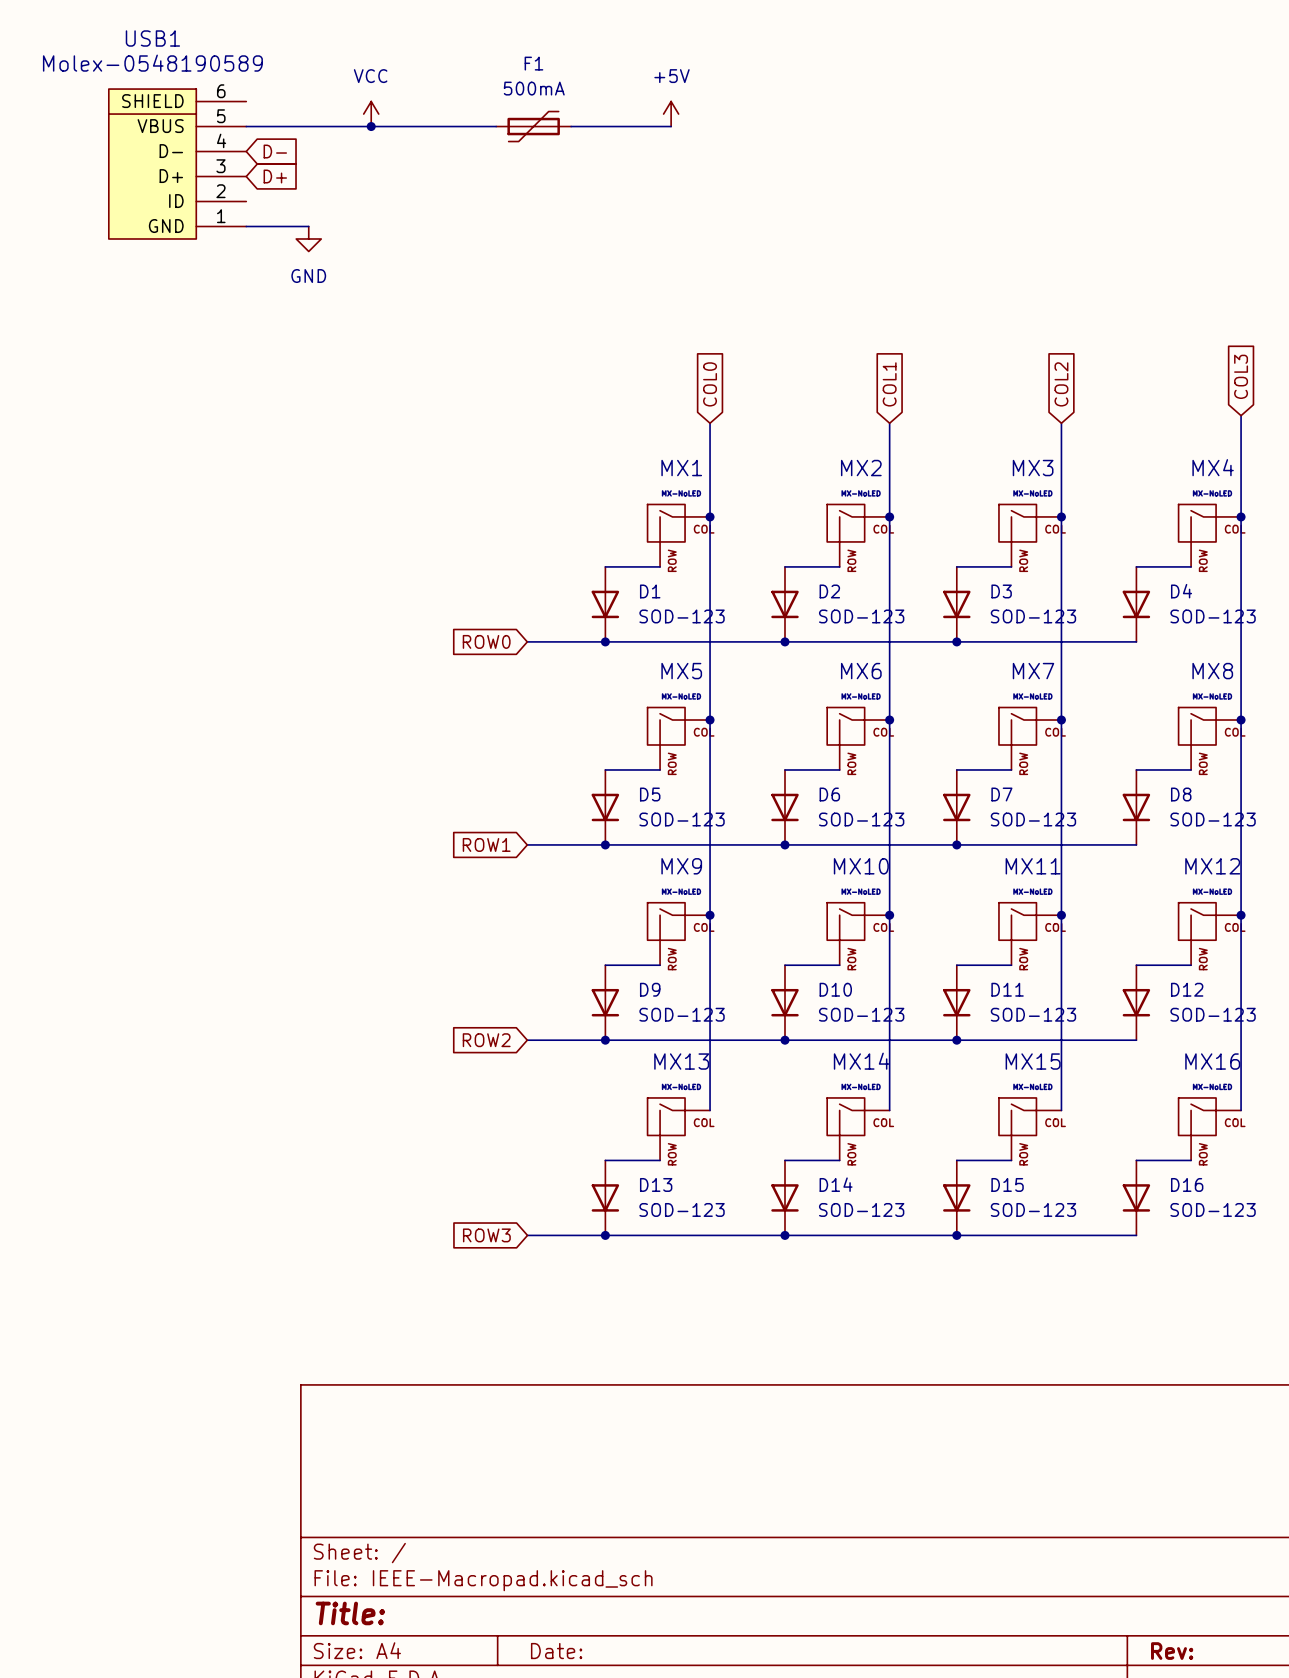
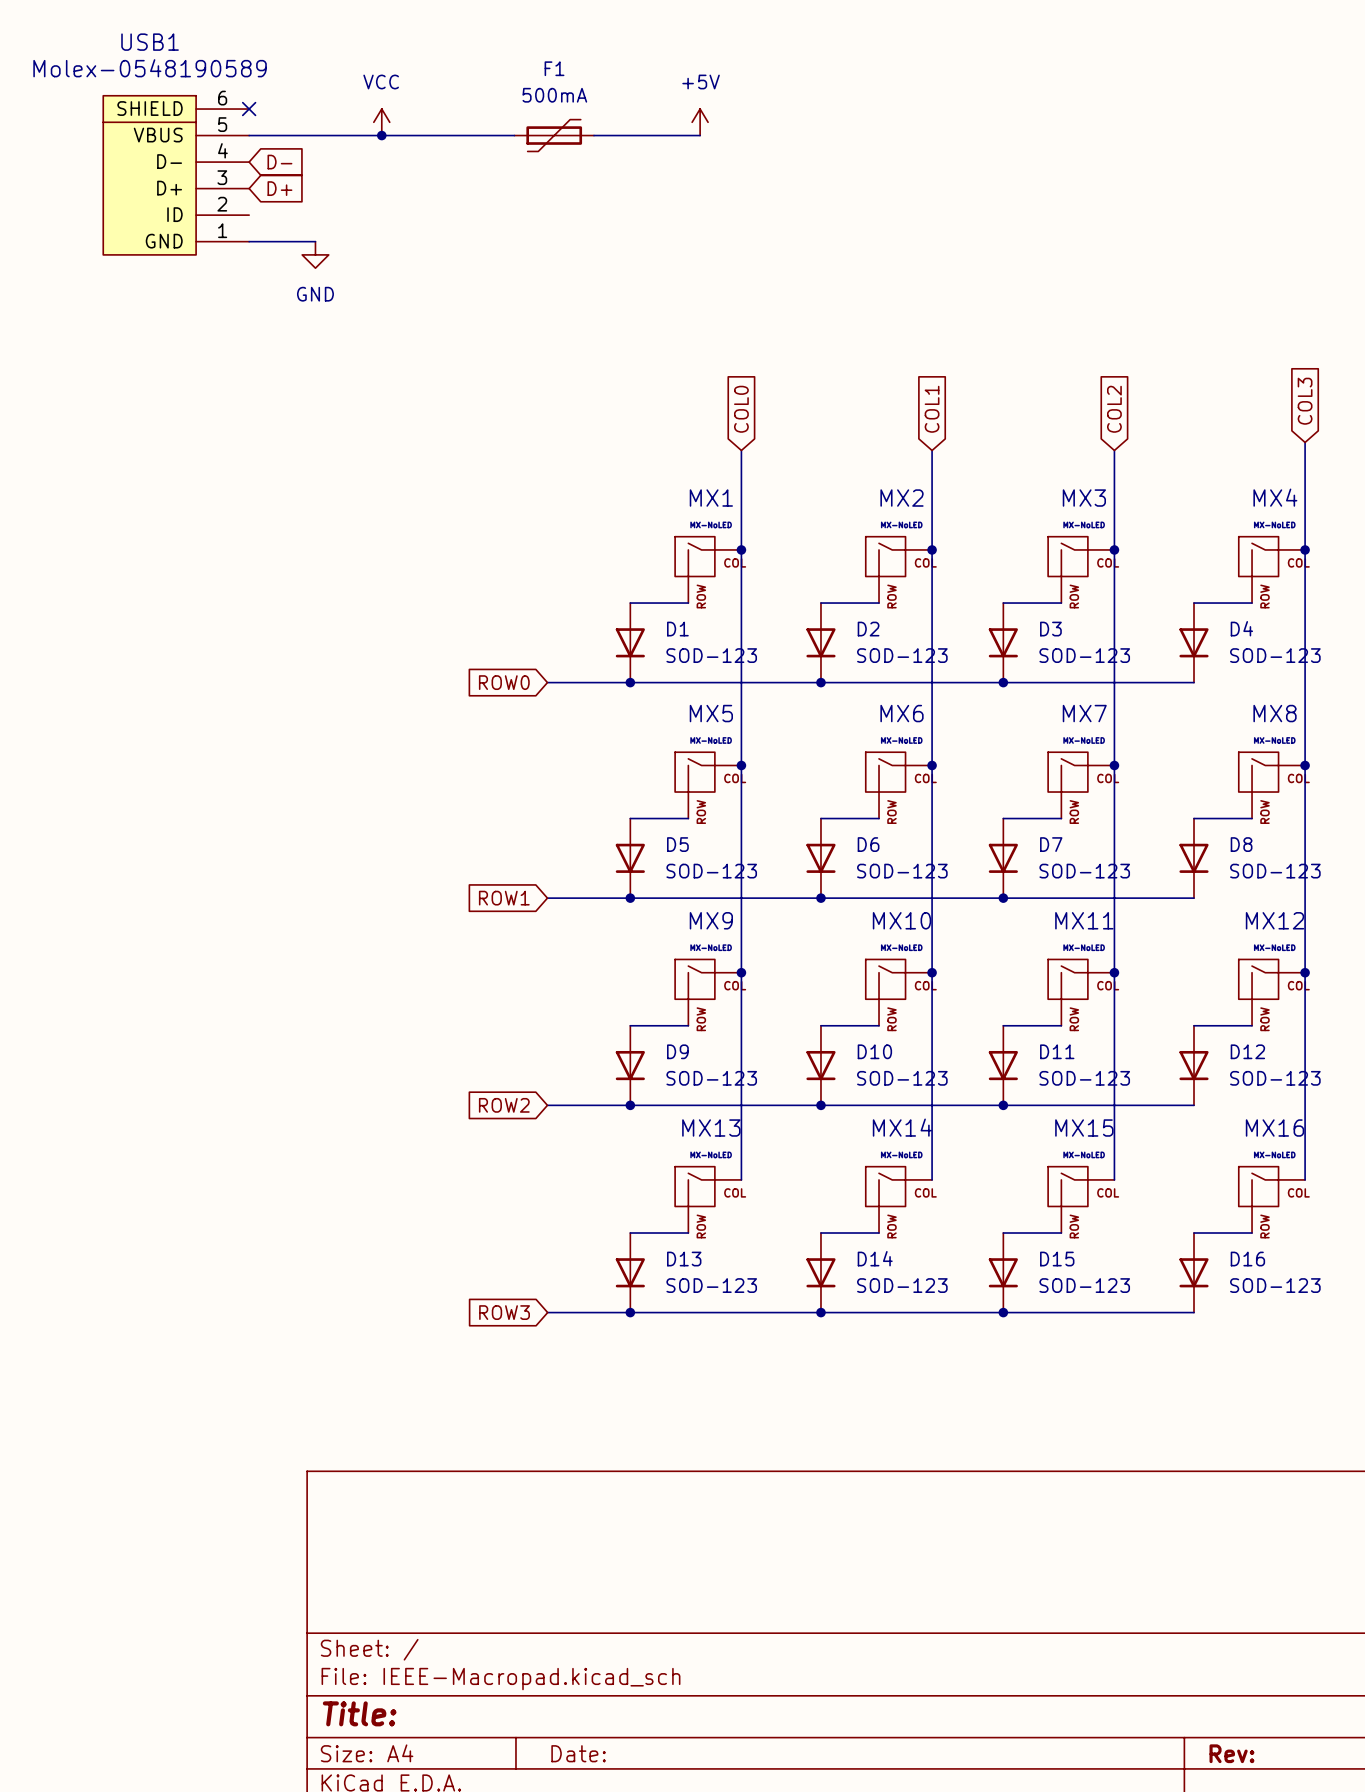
no-connect mark: none -> (249, 109)

